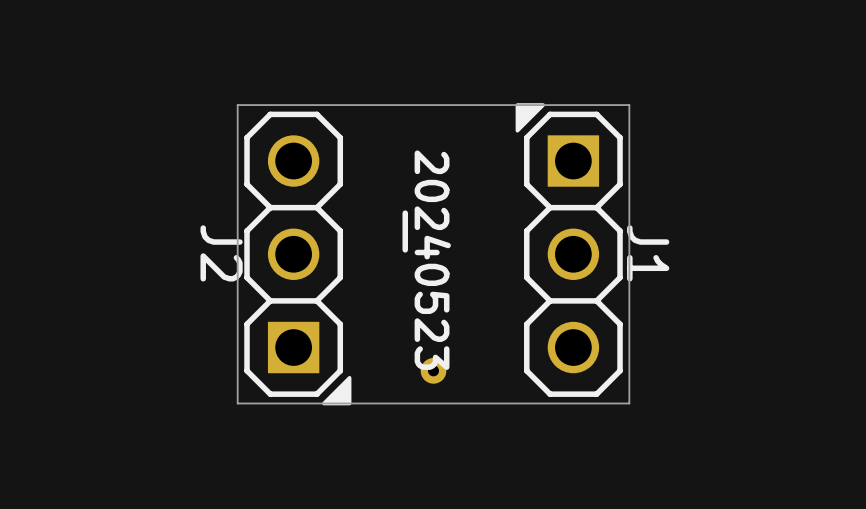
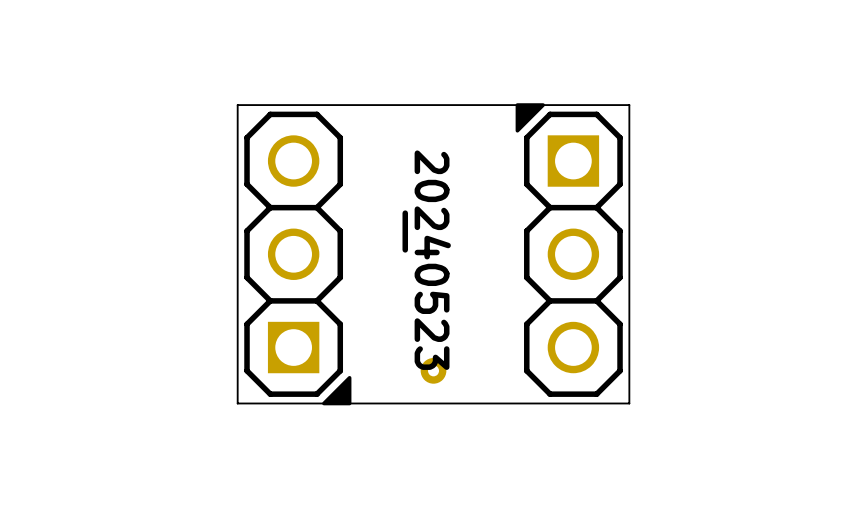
J2 name: J2 (221, 253) -> none
J1 name: J1 (648, 253) -> none

